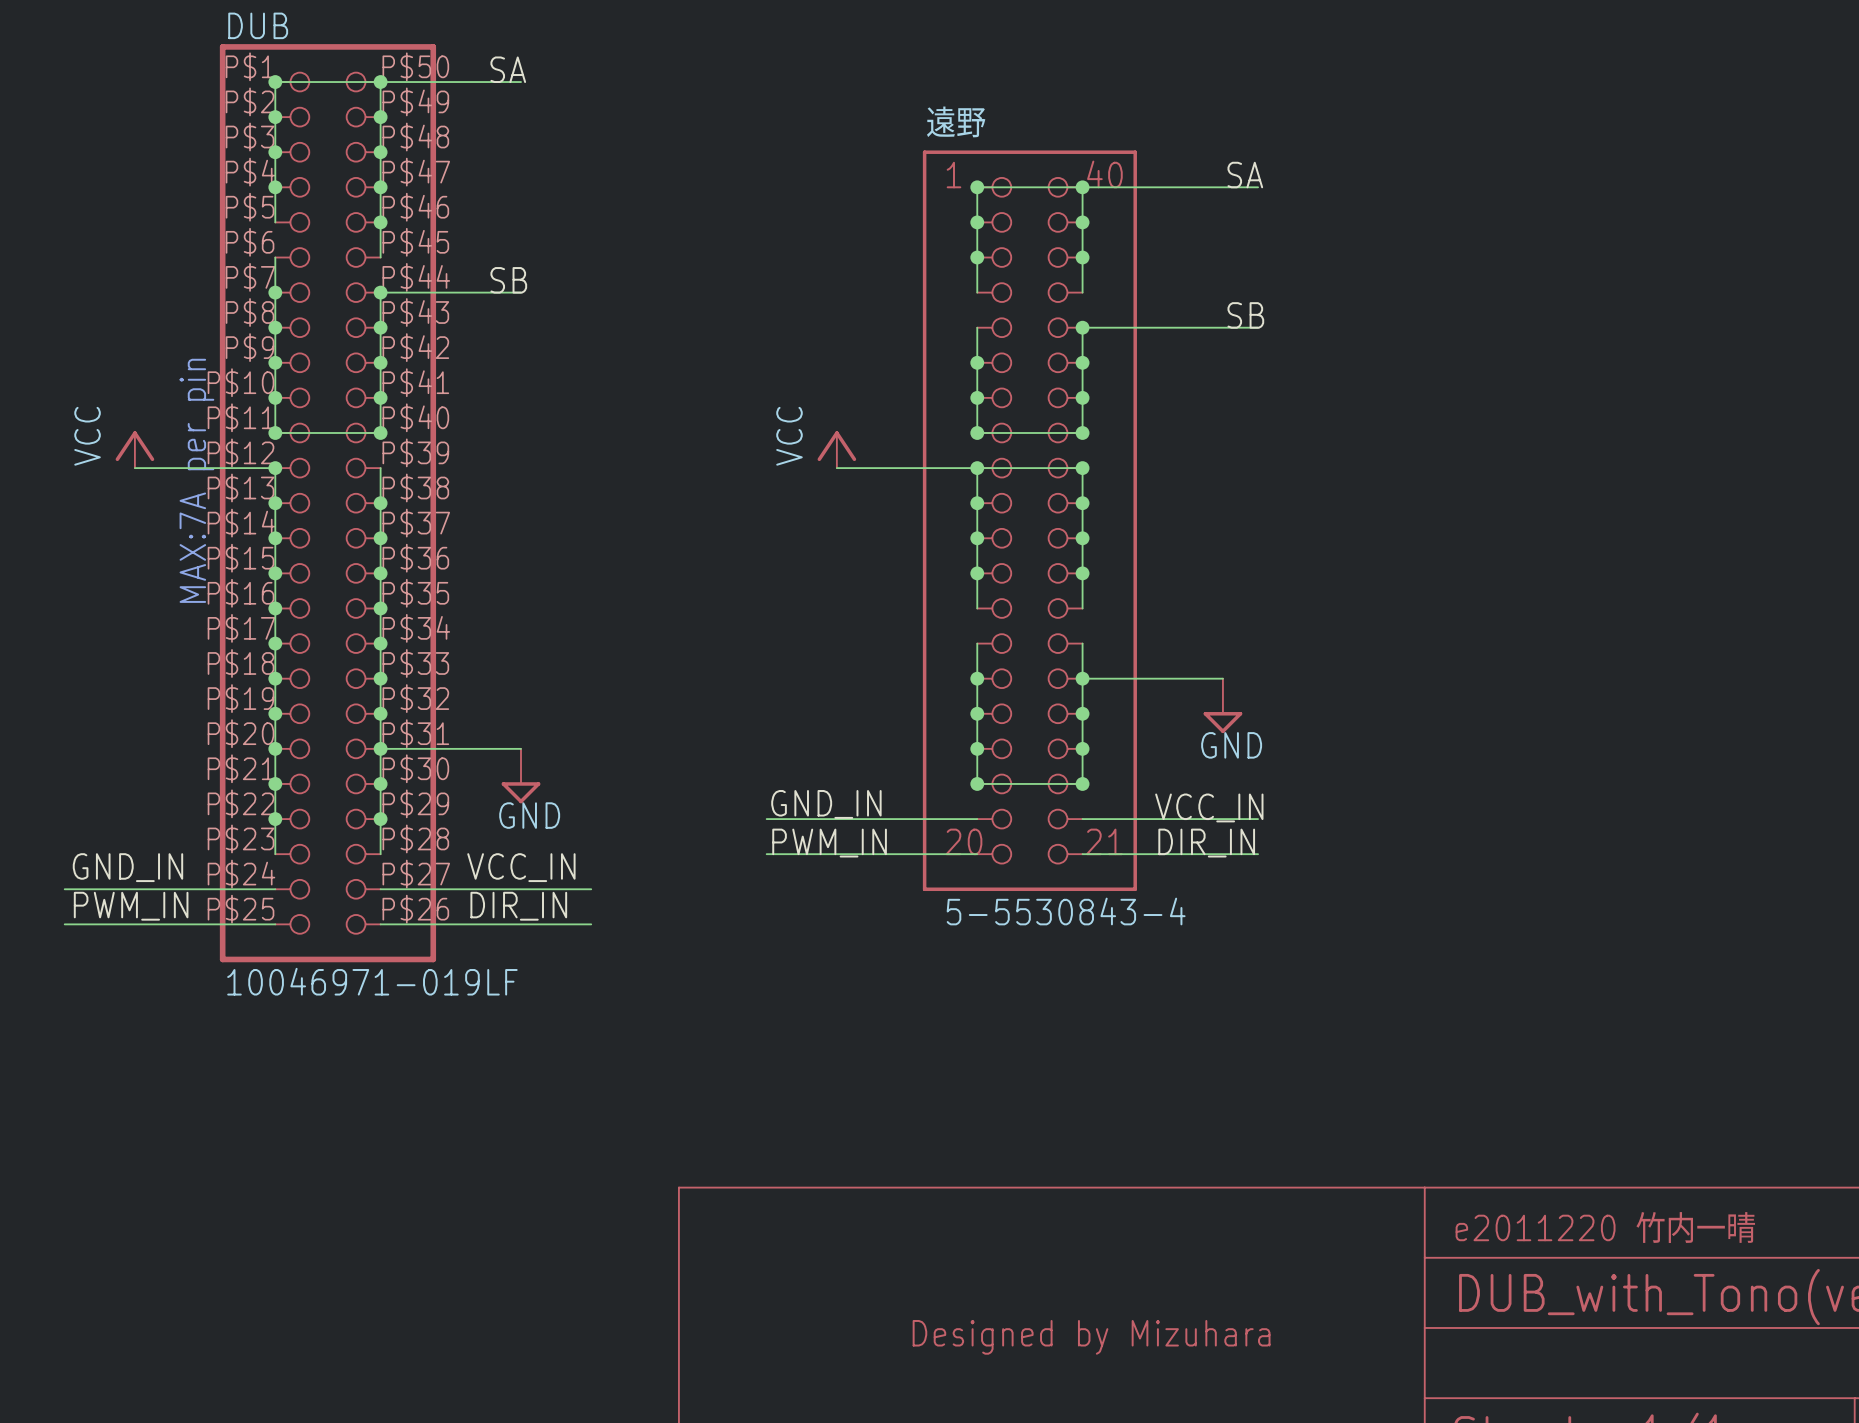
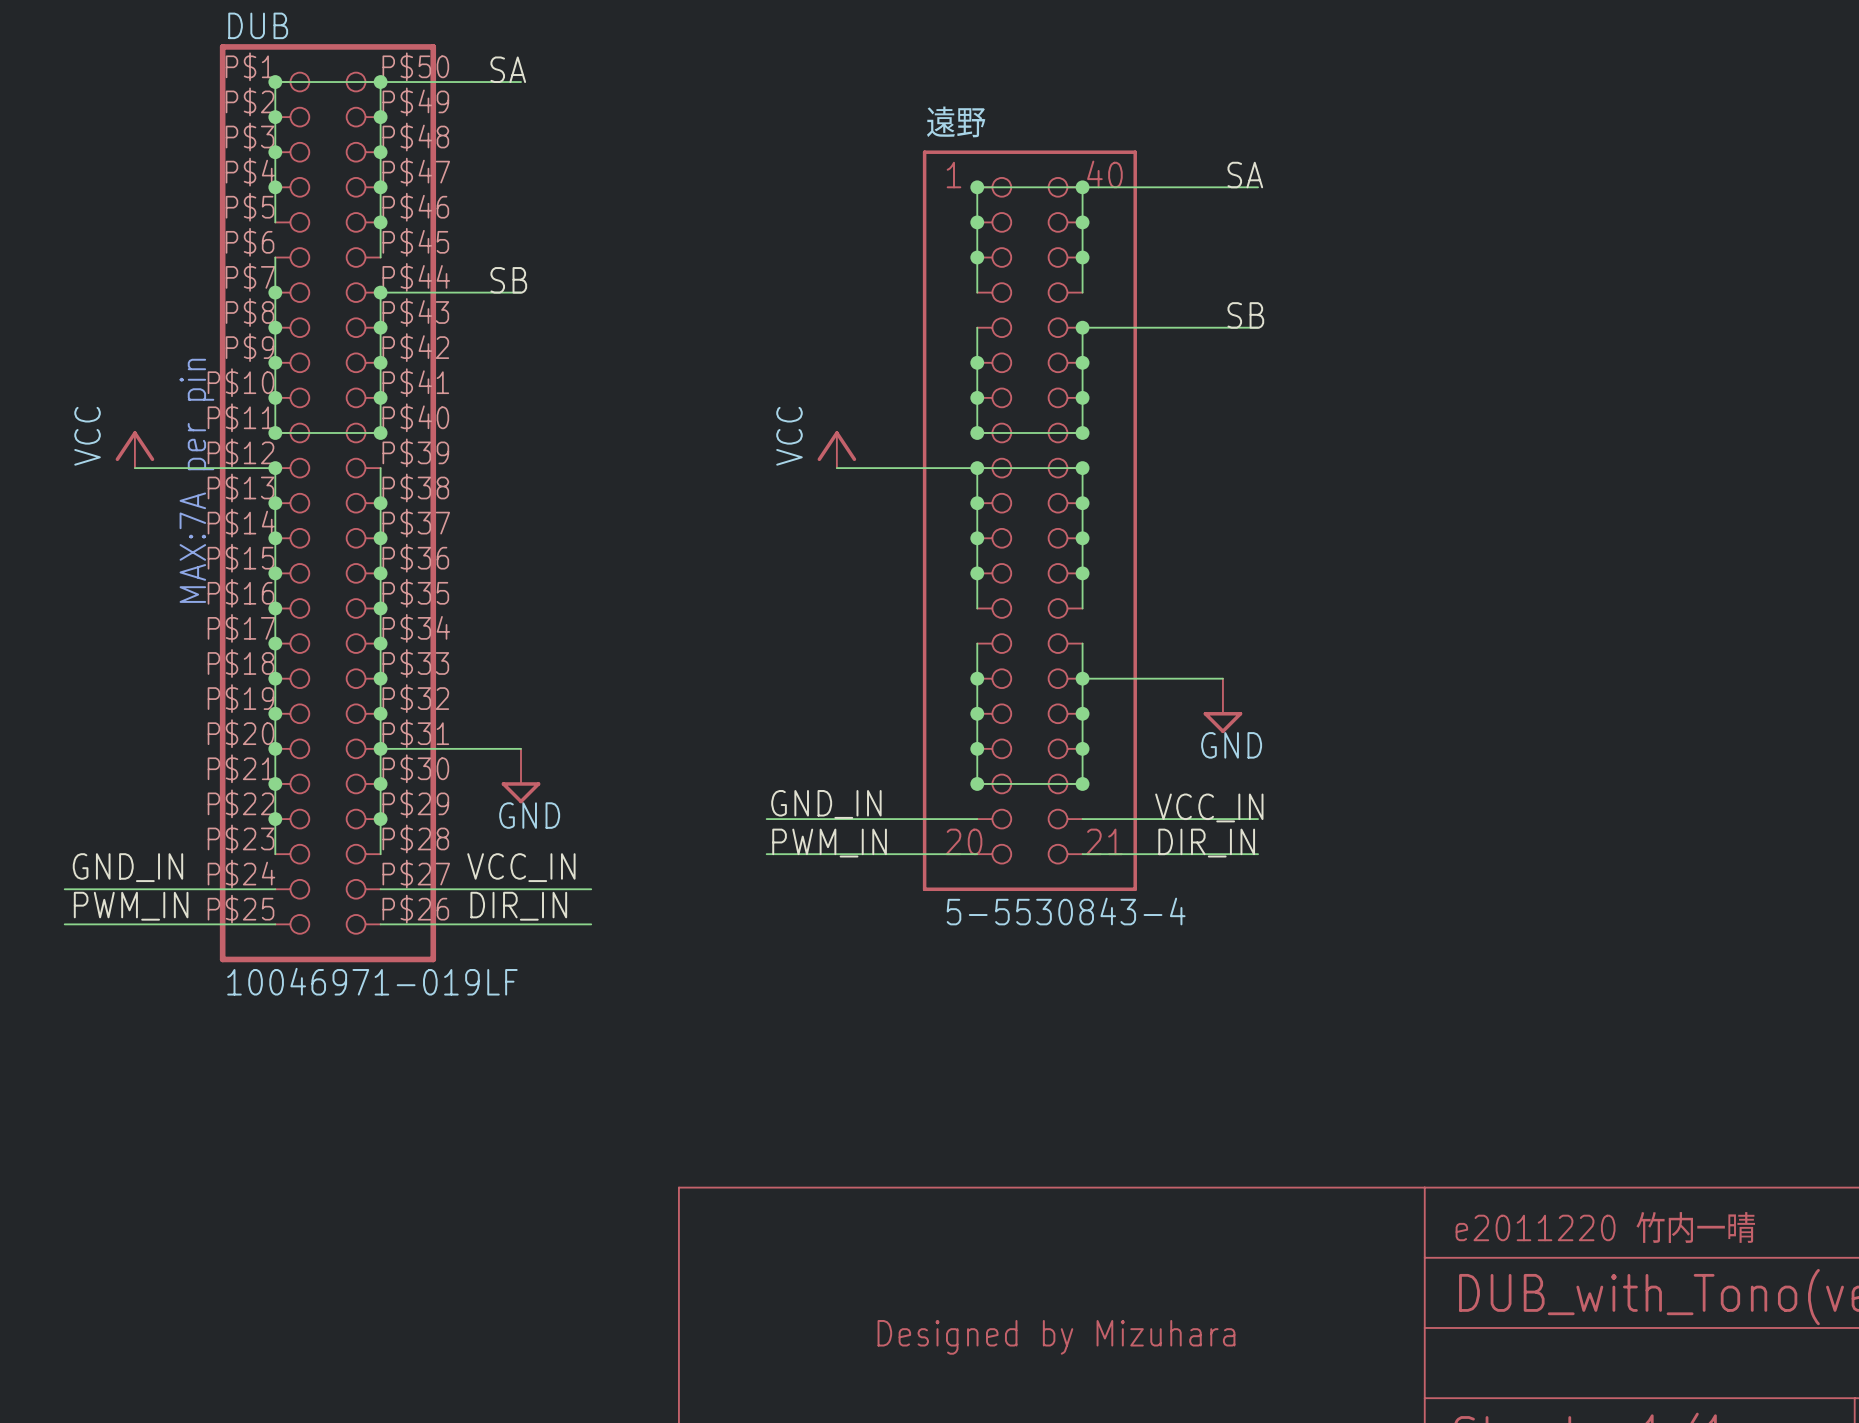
part position: (1091, 1337) -> (1056, 1337)

